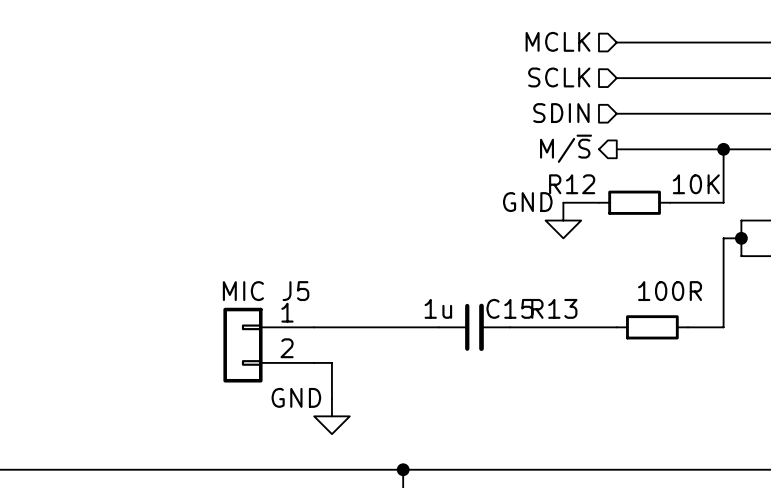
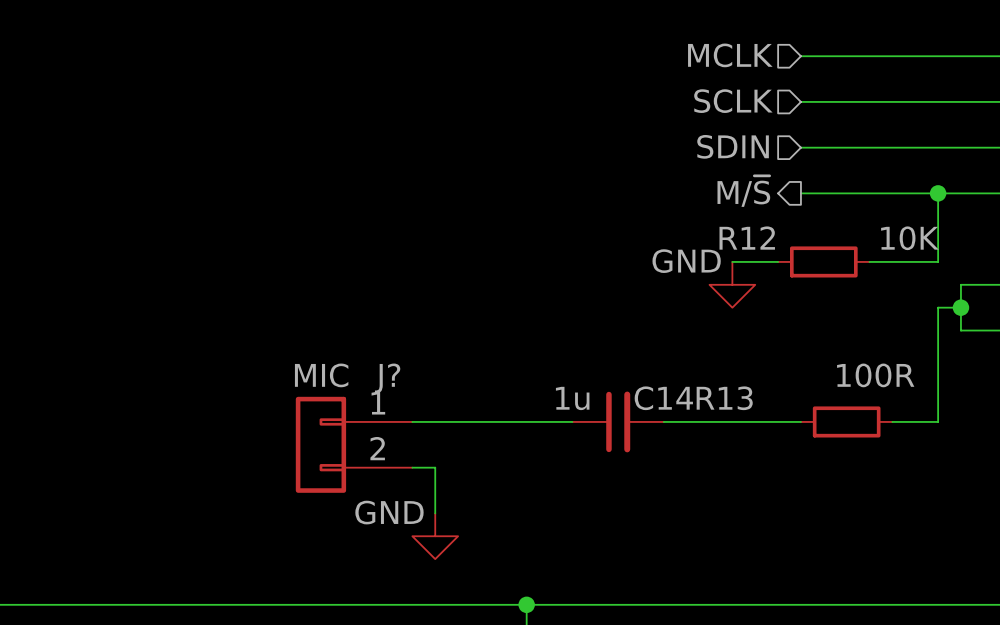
J5 name: J5 (295, 291) -> J? (387, 378)
C15 name: C15 (509, 308) -> C14 (663, 398)

